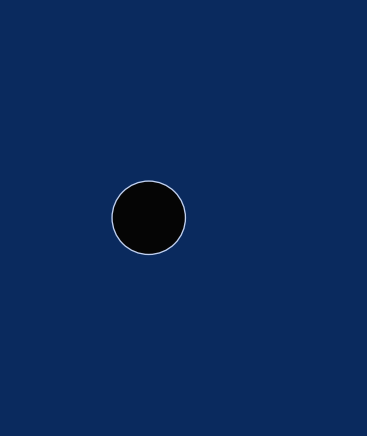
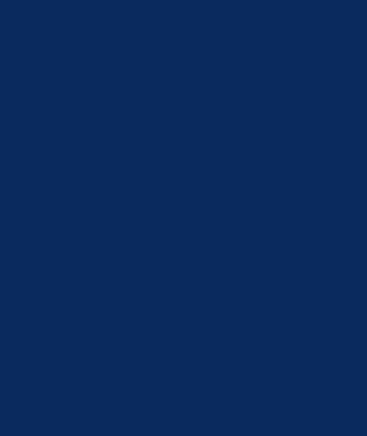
part: (148, 217) -> none

